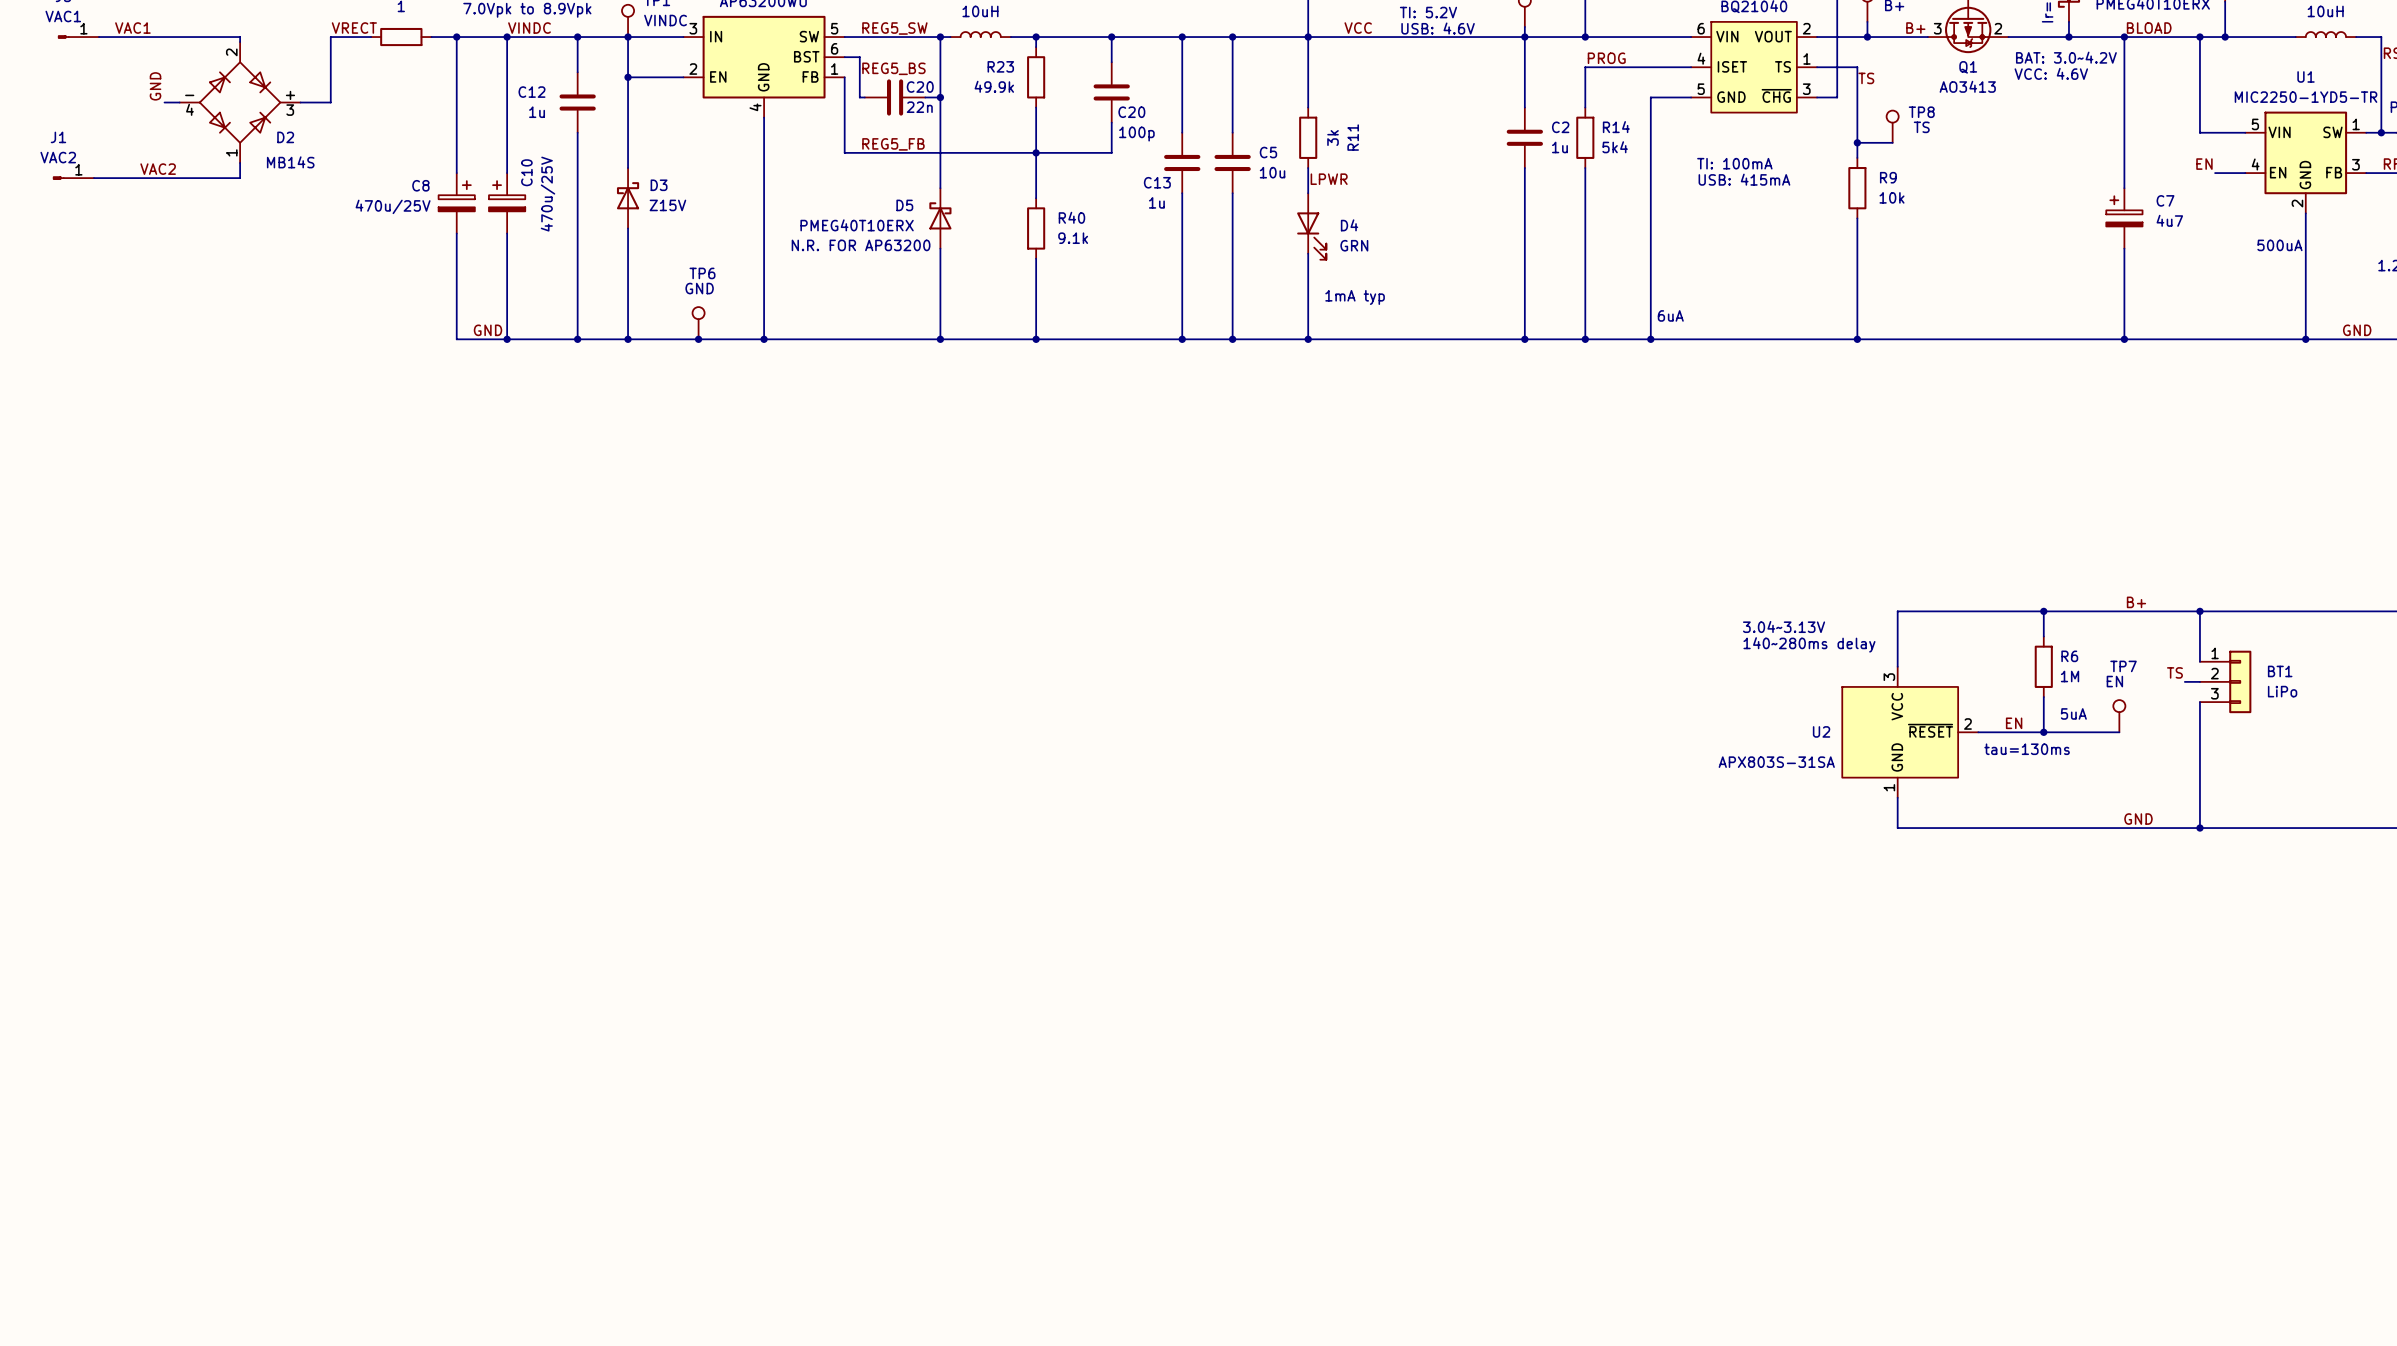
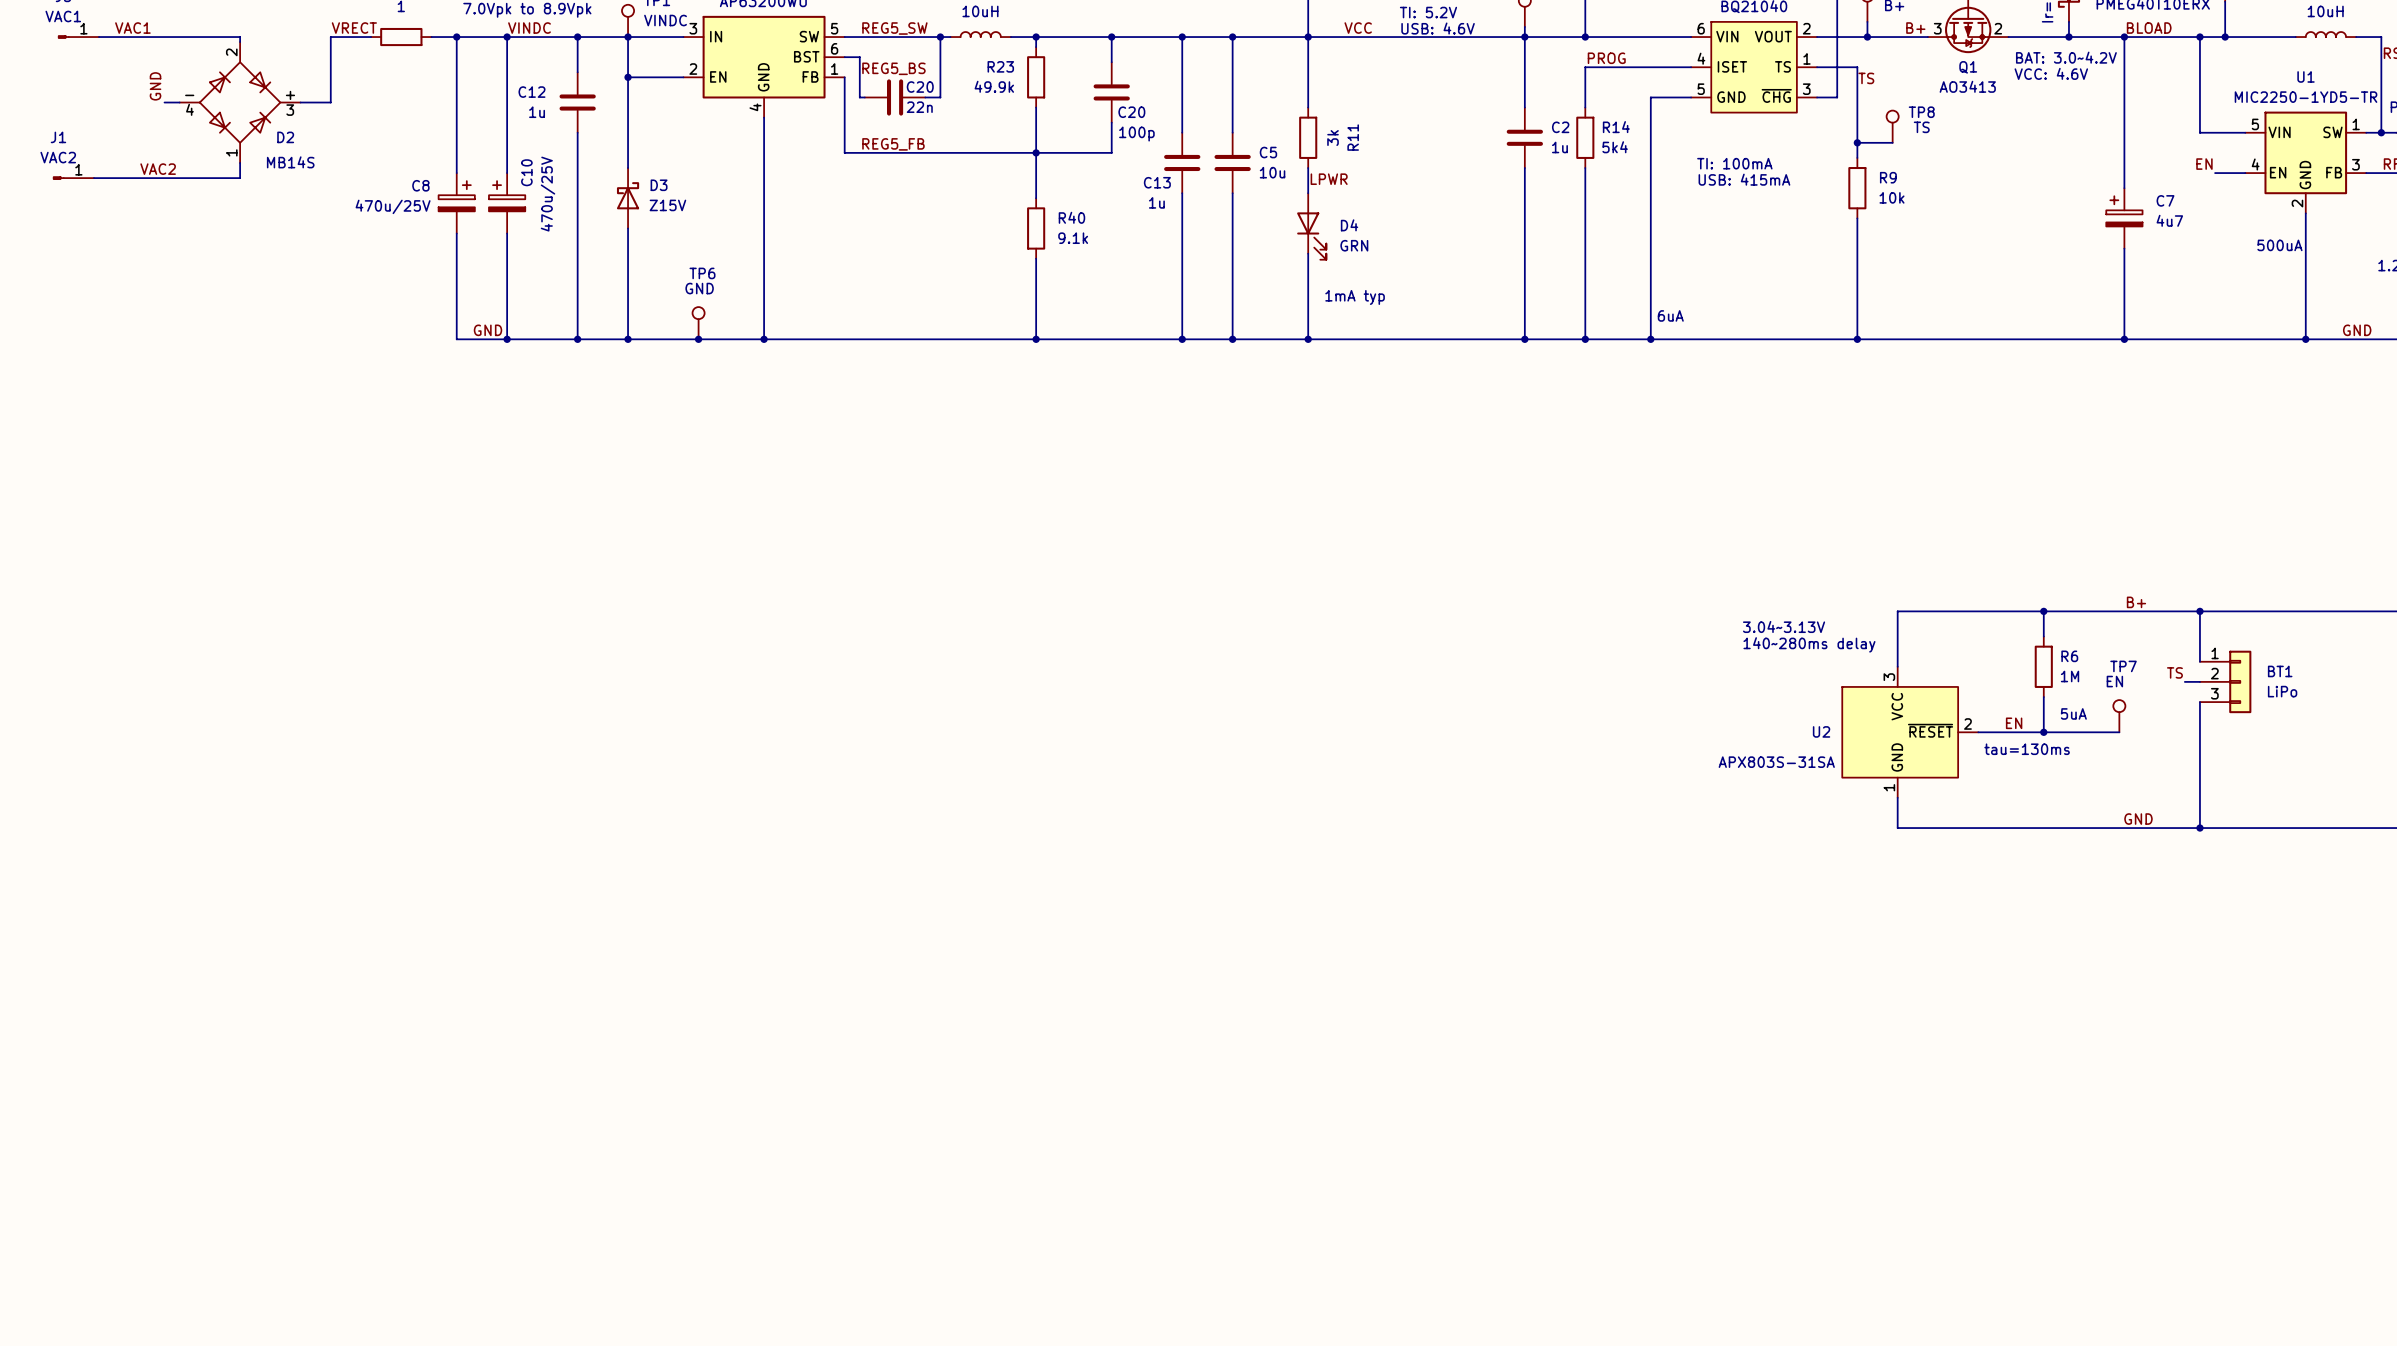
wire: (940, 97) (940, 188) -> none
junction: (940, 97) -> none
D5: PMEG40T10ERX (940, 218) -> none
text: N.R. FOR AP63200 (861, 245) -> none
wire: (940, 248) (940, 339) -> none
junction: (940, 339) -> none

